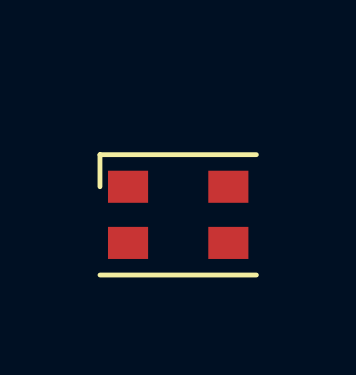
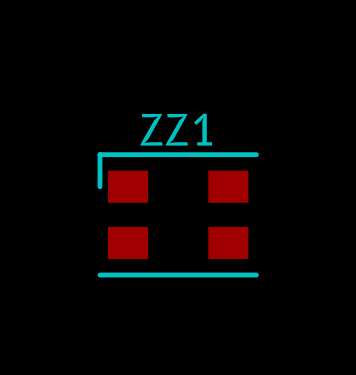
ZZ1 name: none -> ZZ1 (176, 129)

